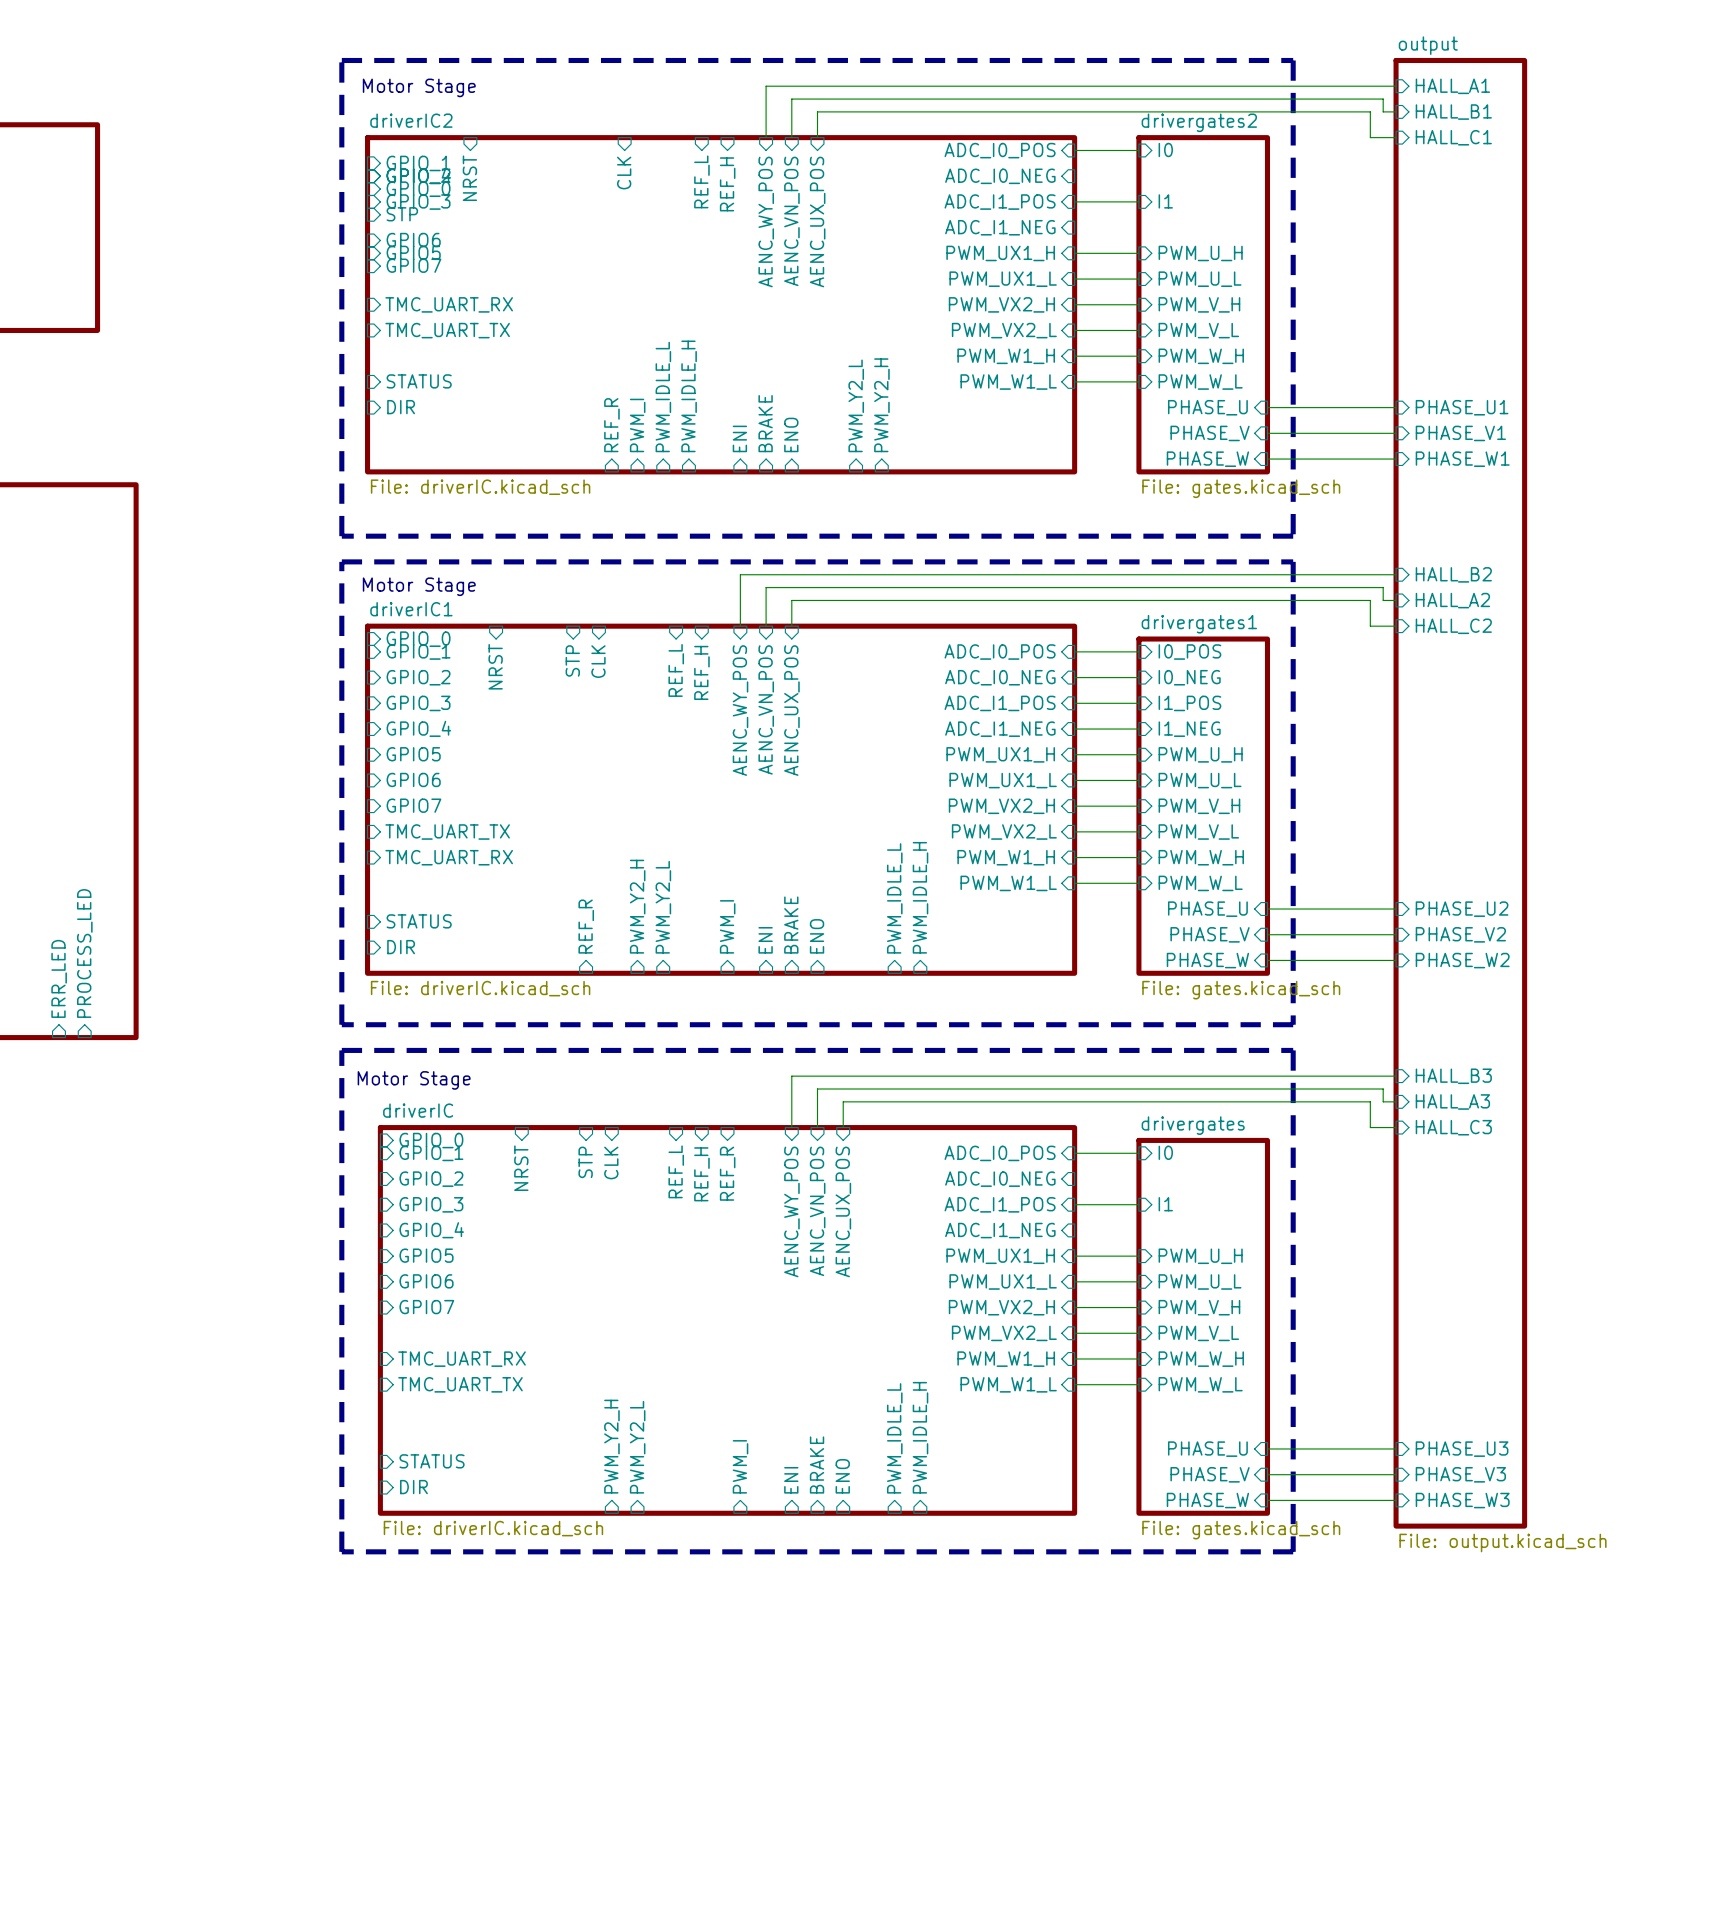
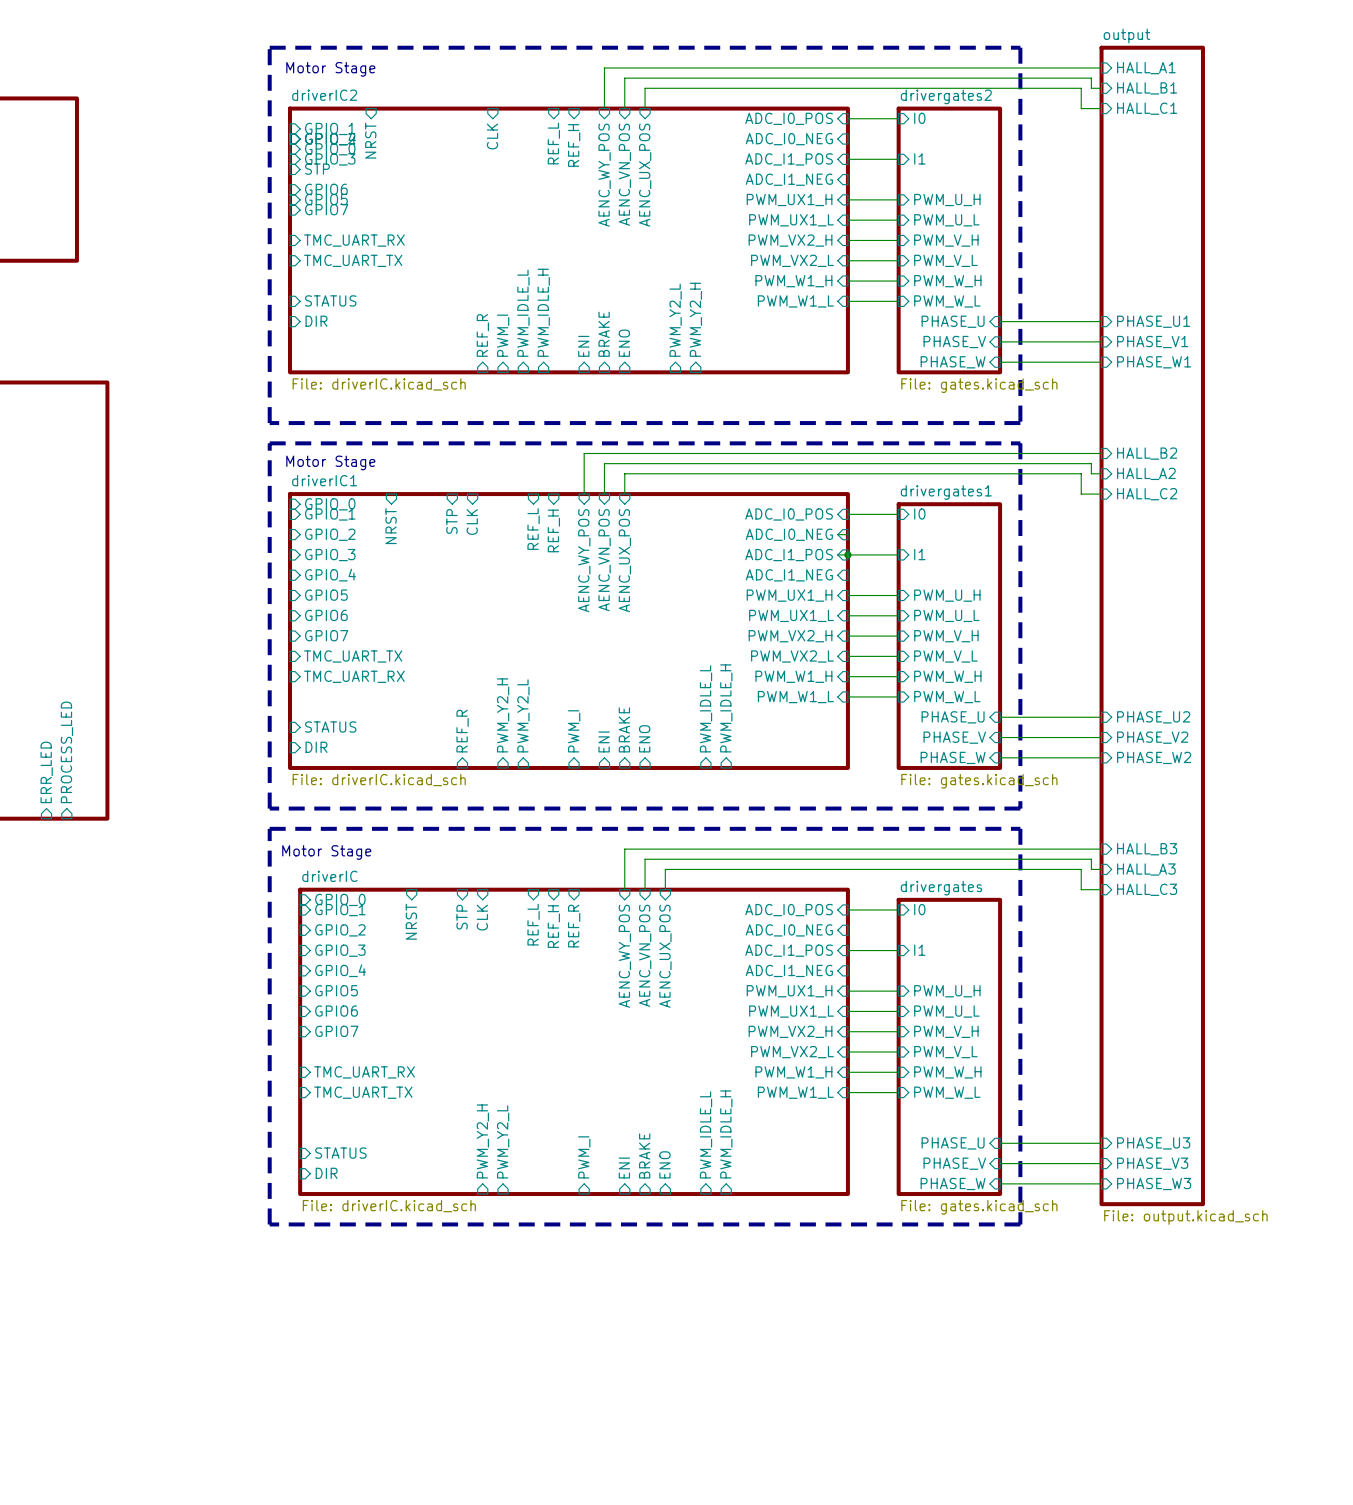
sheet pin: I0_POS (1189, 652) -> I0 (919, 513)
wire: (1074, 677) (1138, 677) -> (847, 534) (837, 534)
sheet pin: I0_NEG (1189, 677) -> none
wire: none -> (837, 554) (847, 554)
junction: none -> (847, 554)
sheet pin: I1_POS (1189, 703) -> I1 (919, 554)
wire: (1074, 729) (1138, 729) -> none
sheet pin: I1_NEG (1189, 729) -> none

